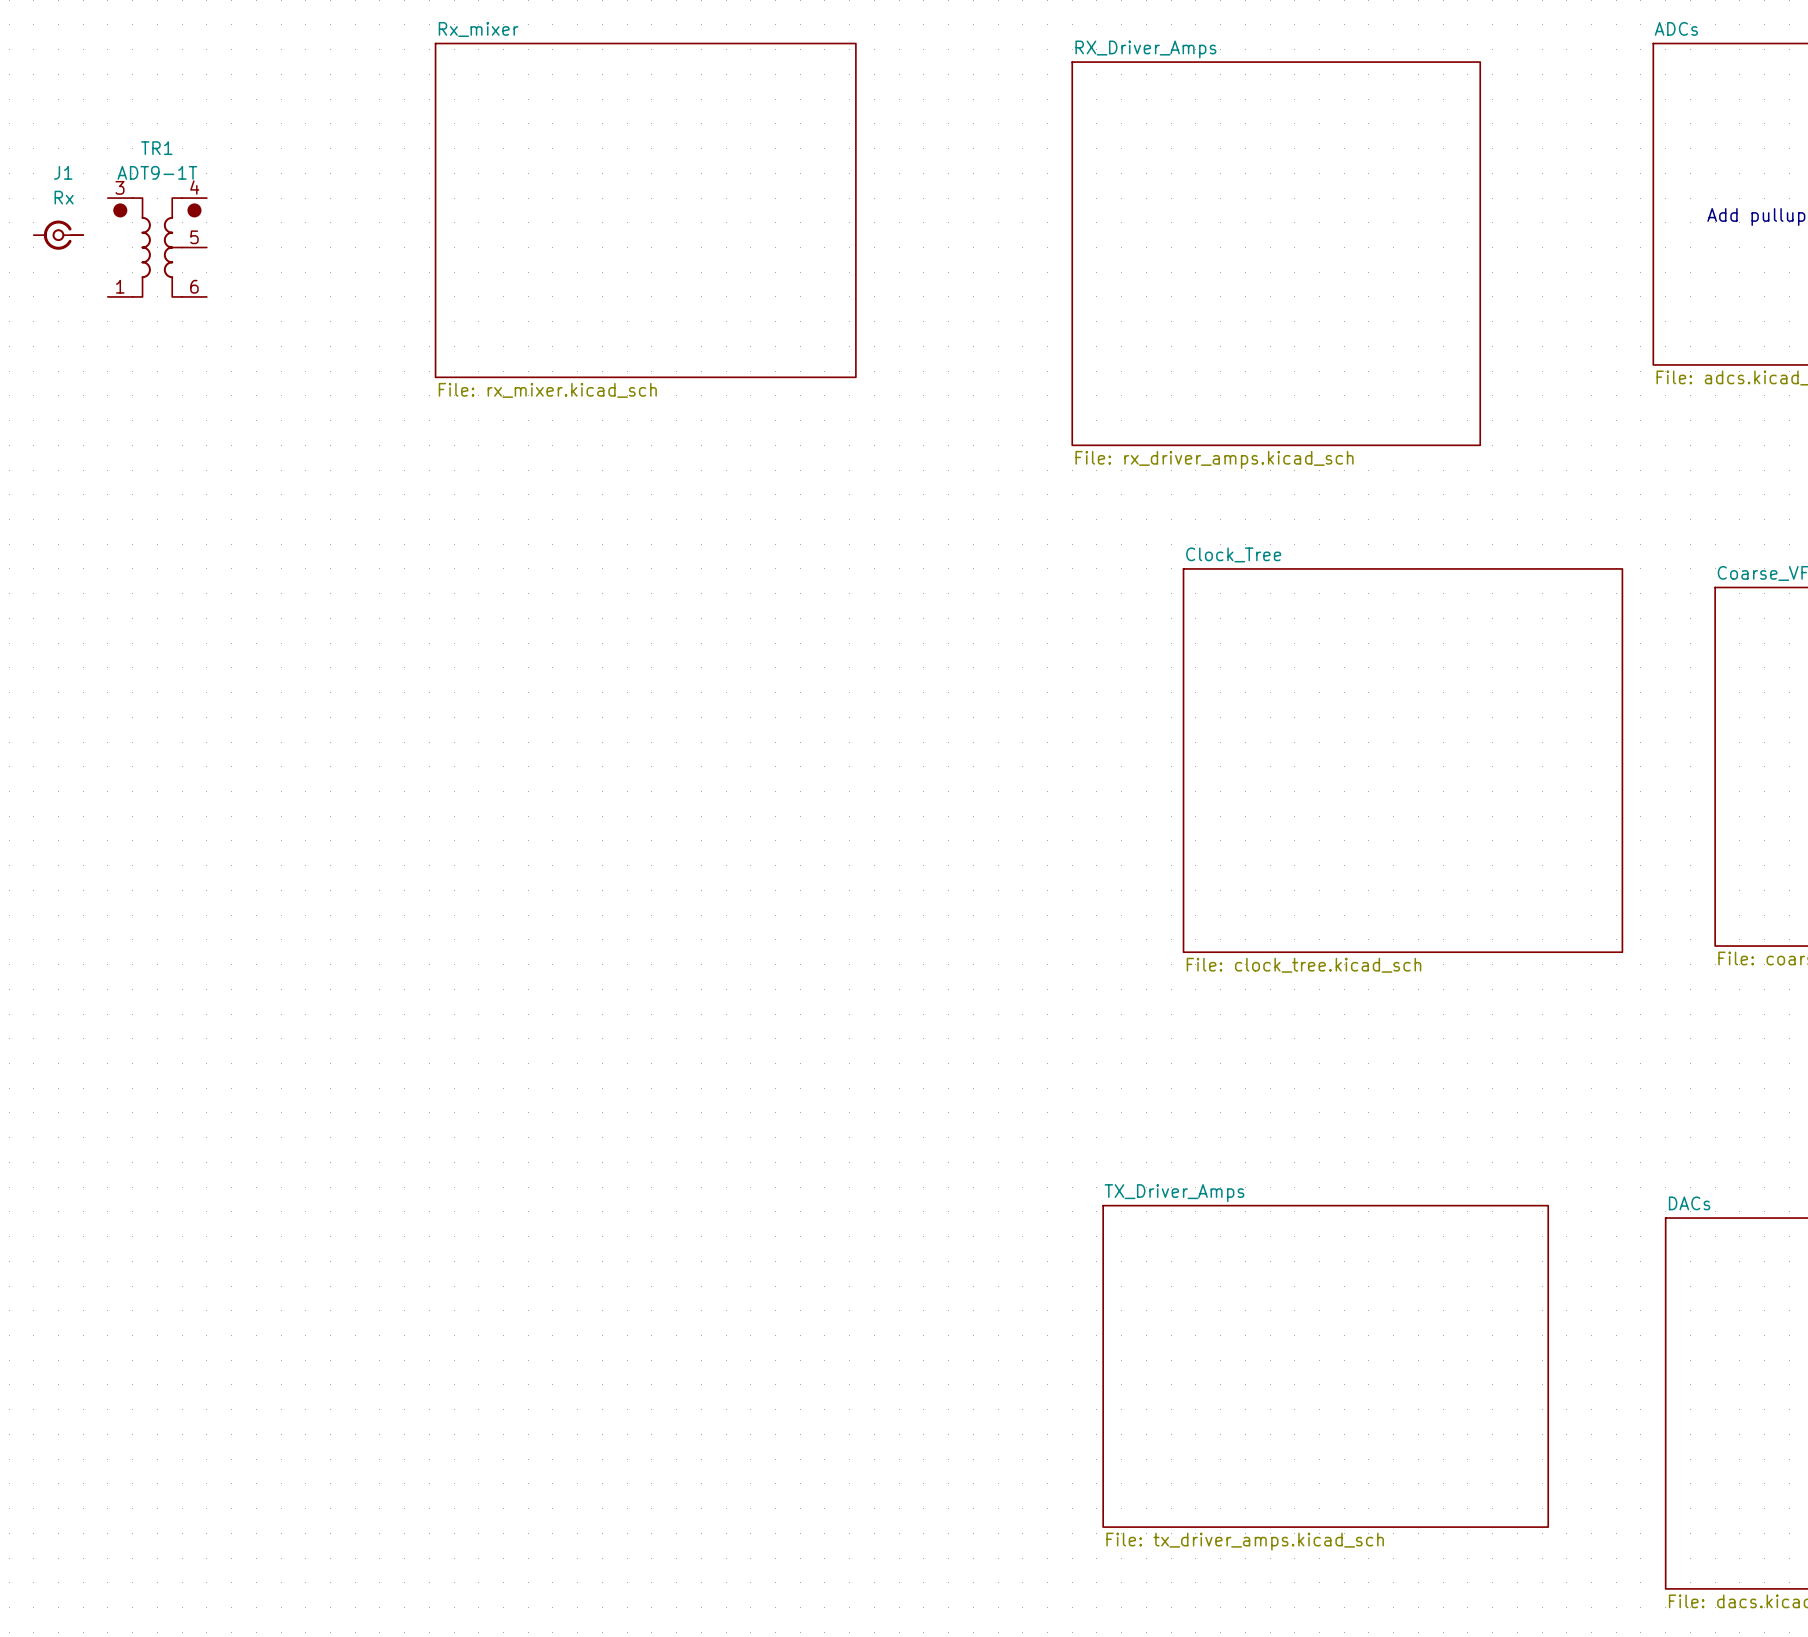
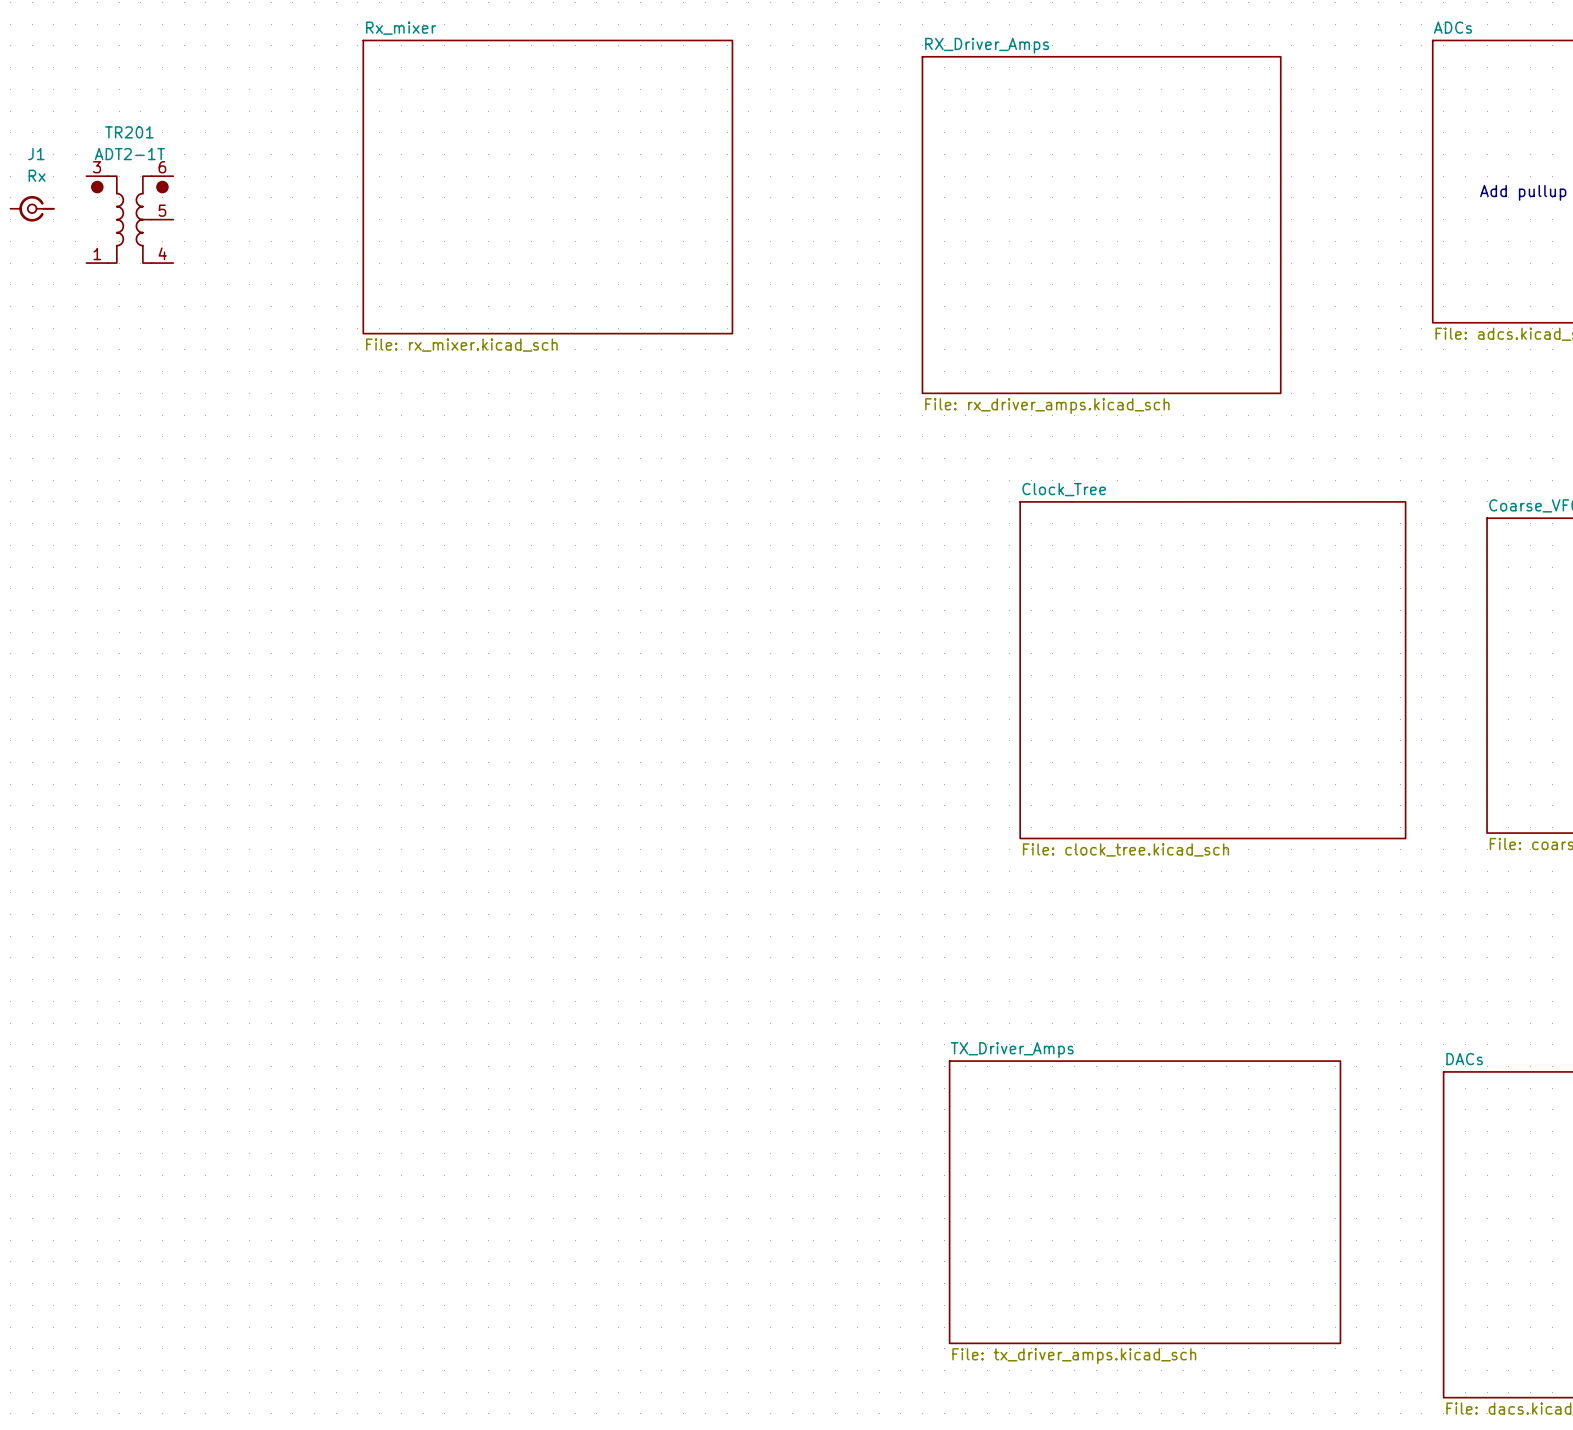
TR1: ADT9-1T (157, 247) -> none
TR201: none -> ADT2-1T (129, 219)

